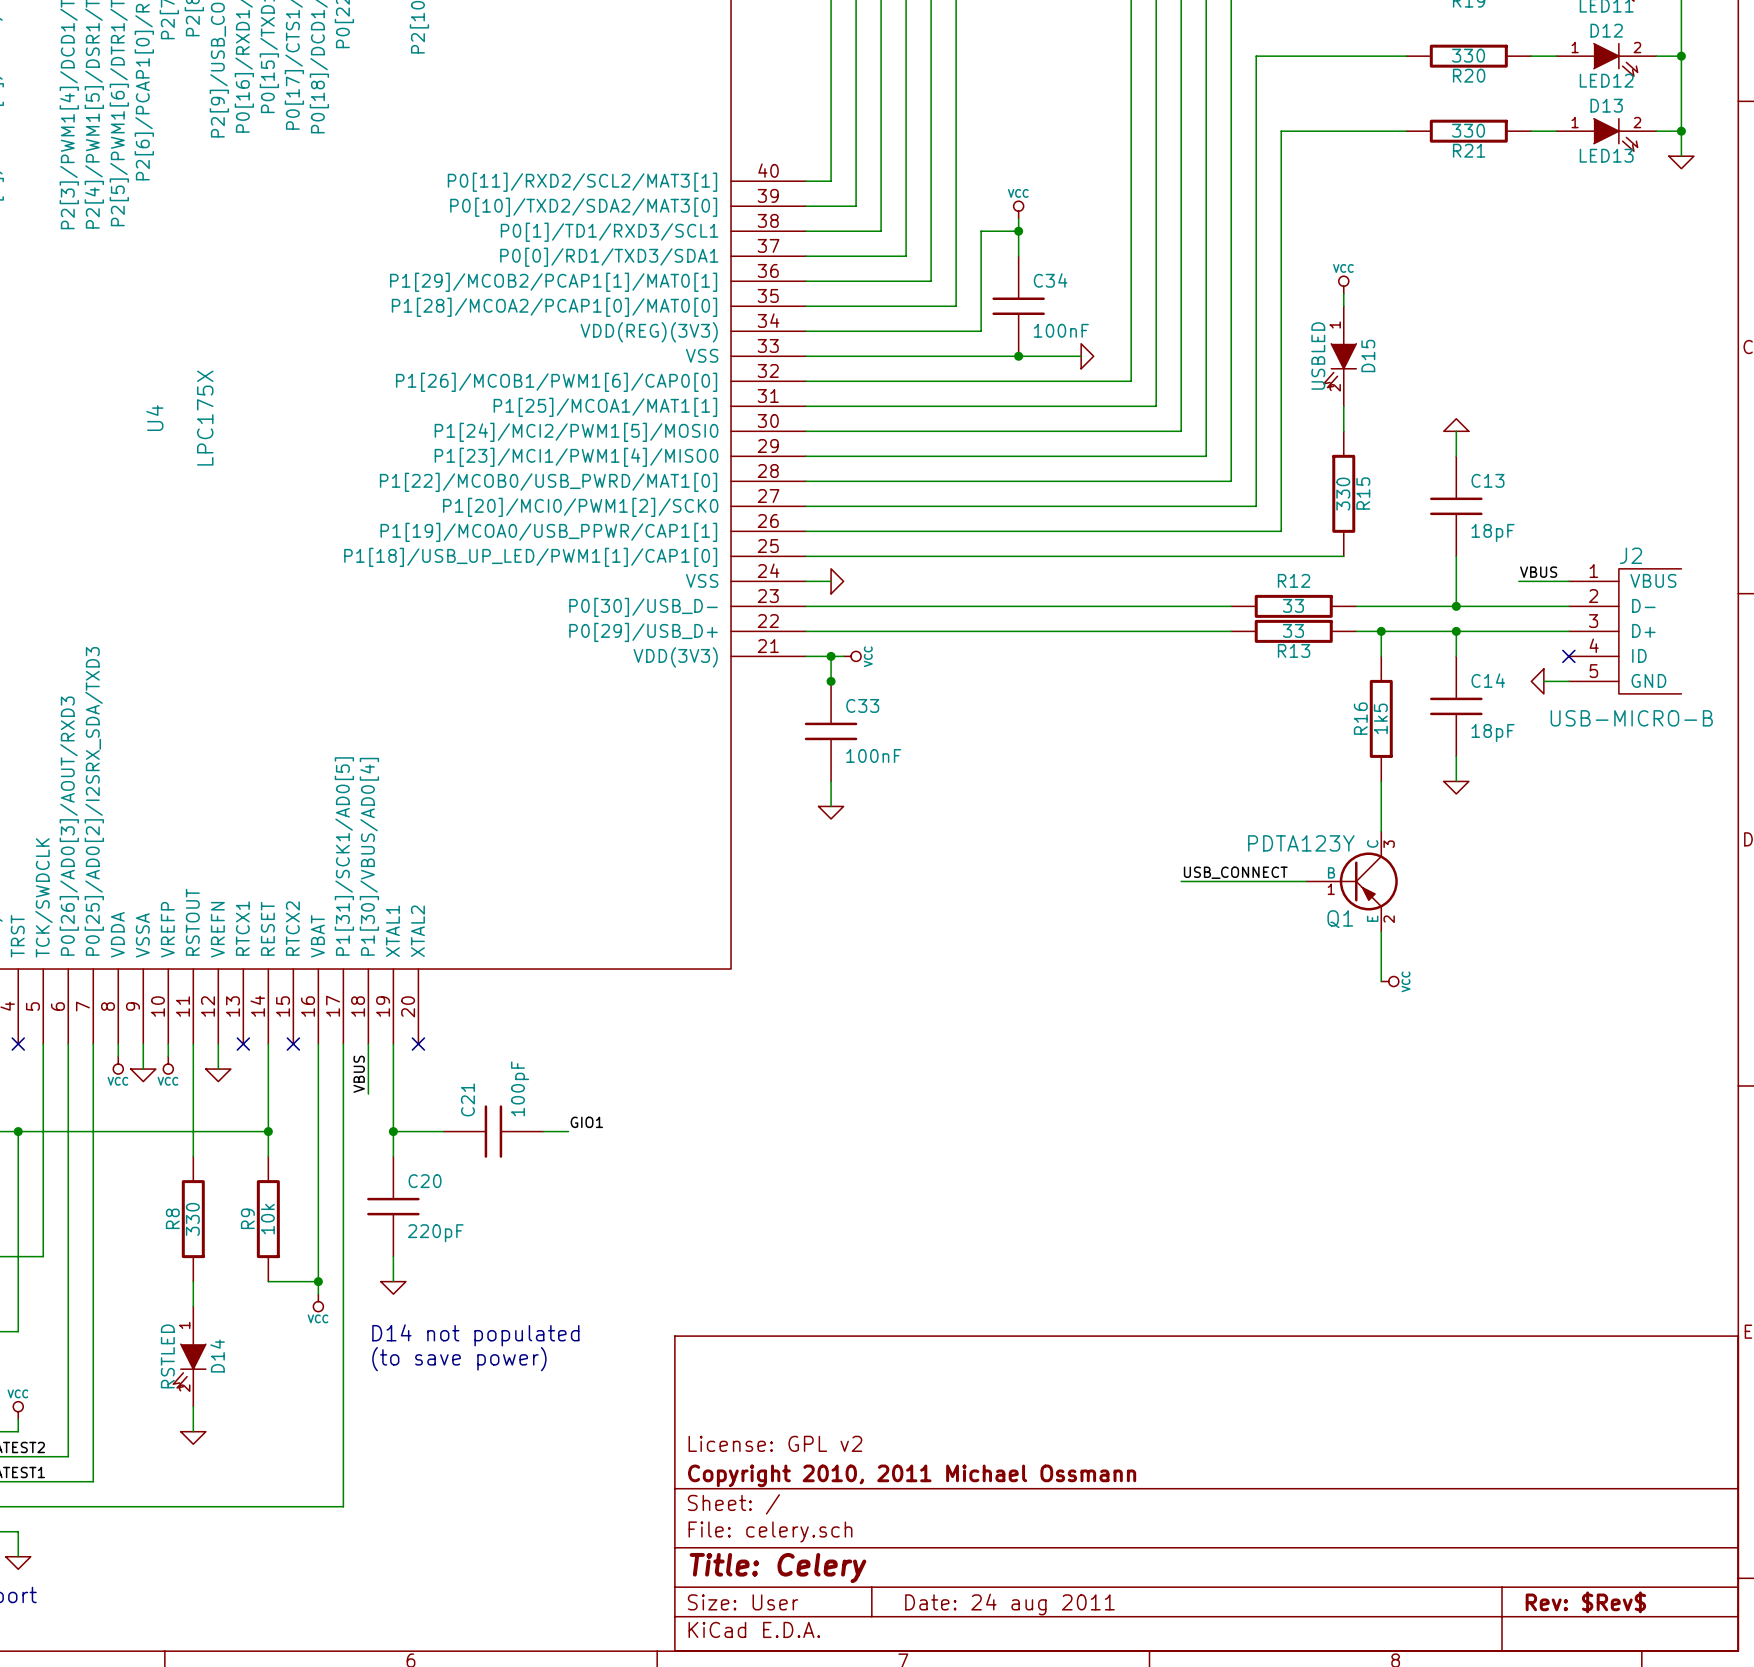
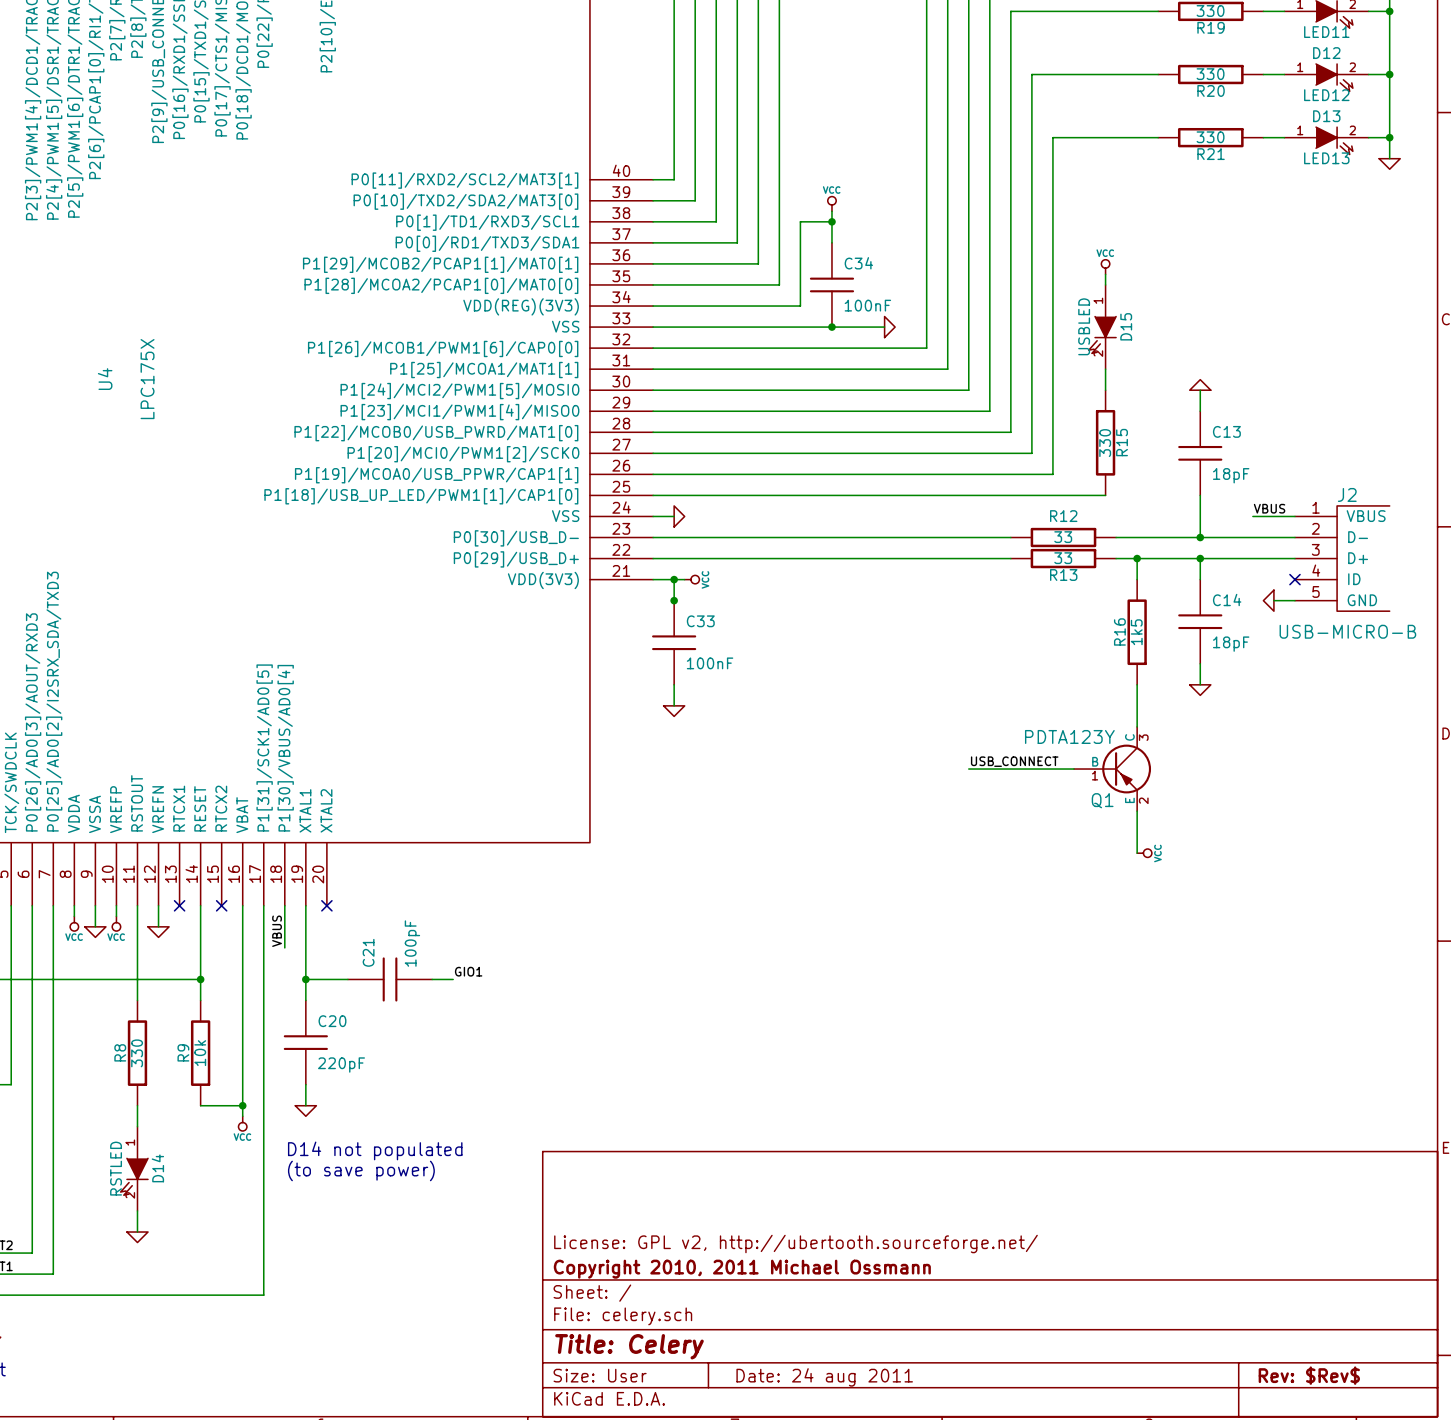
title block: License: GPL v2 (775, 1443) -> License: GPL v2, http://ubertooth.sourceforge.net/ (795, 1244)

